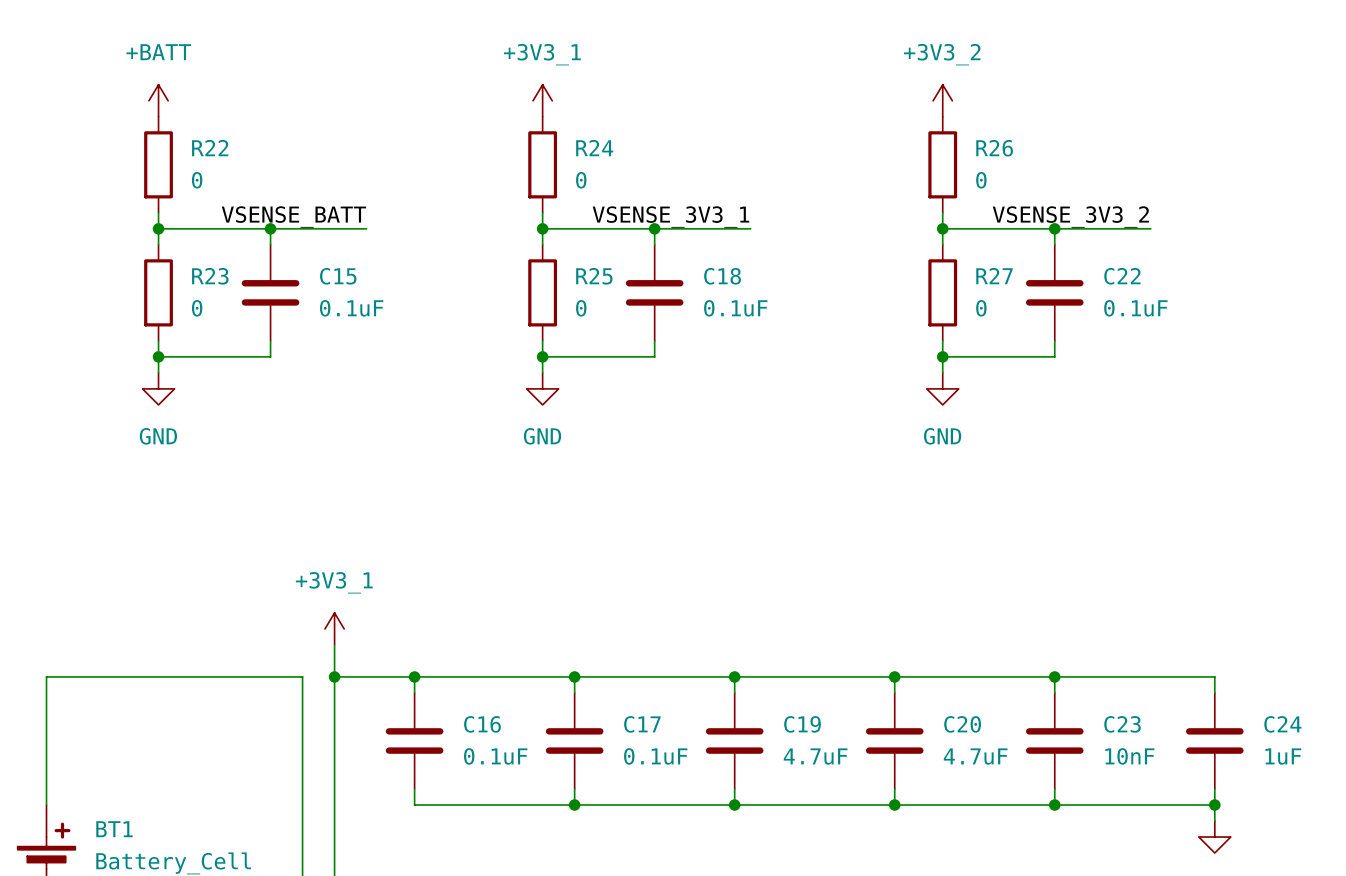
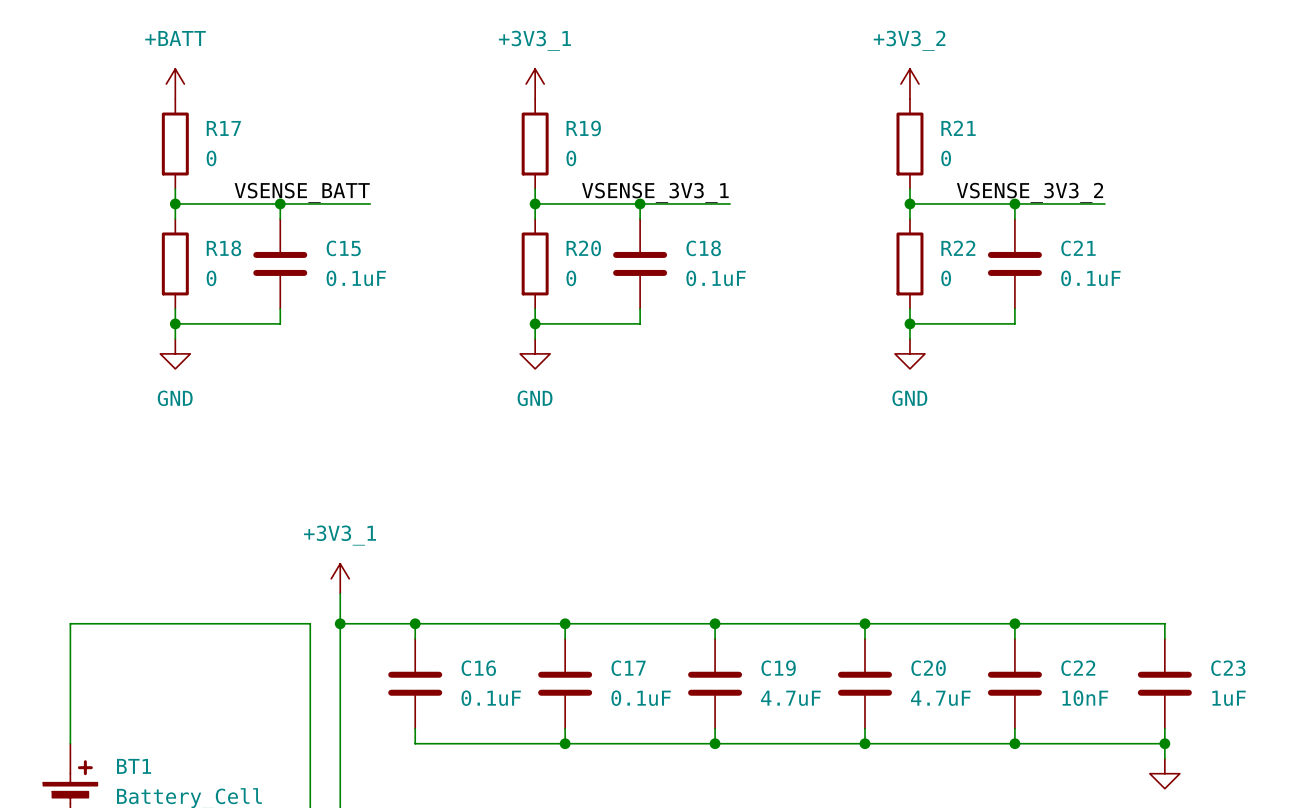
R22 name: R22 (210, 148) -> R17 (223, 128)
R24 name: R24 (594, 148) -> R19 (583, 128)
R26 name: R26 (994, 148) -> R21 (958, 128)
R23 name: R23 (210, 276) -> R18 (223, 248)
R25 name: R25 (594, 276) -> R20 (583, 248)
R27 name: R27 (994, 276) -> R22 (958, 248)
C22 name: C22 (1122, 276) -> C21 (1078, 248)
C23 name: C23 (1122, 724) -> C22 (1078, 668)
C24 name: C24 (1282, 724) -> C23 (1228, 668)

